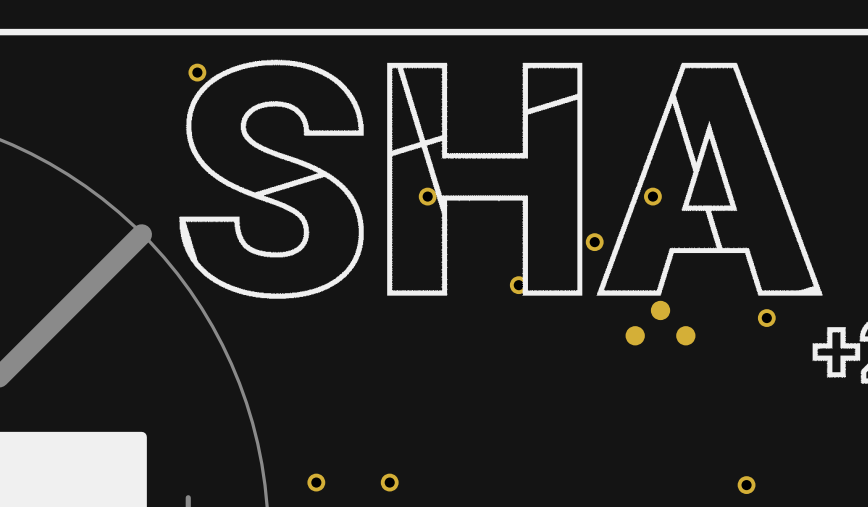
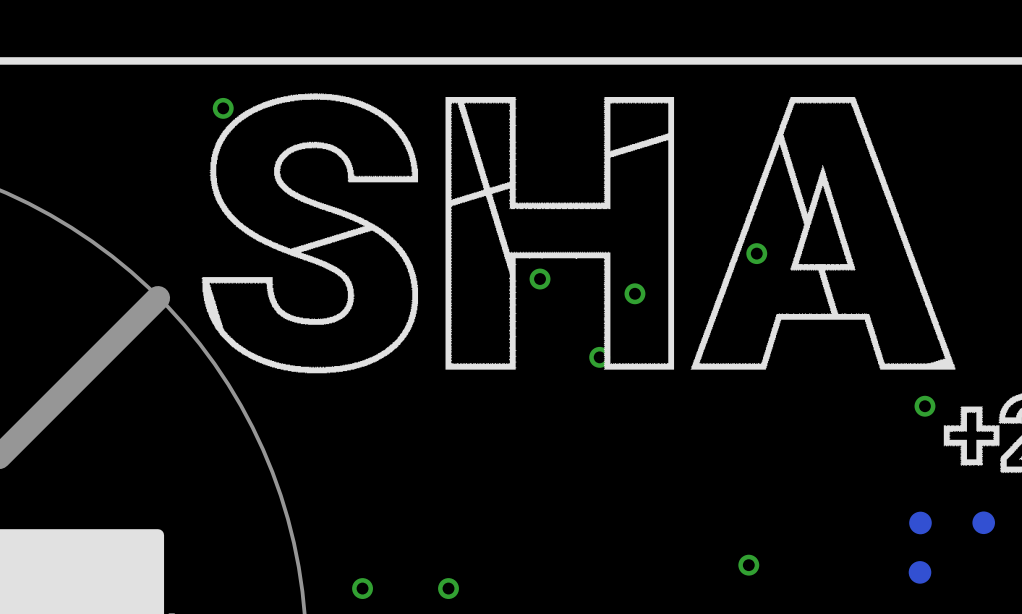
part position: (427, 196) -> (540, 279)
part position: (594, 242) -> (634, 293)
part: (660, 310) -> none
part position: (766, 318) -> (924, 406)
part: (635, 335) -> none
part: (685, 335) -> none
part: none -> (920, 522)
part: none -> (983, 522)
part: none -> (748, 565)
part: none -> (920, 572)
part: (746, 485) -> none

